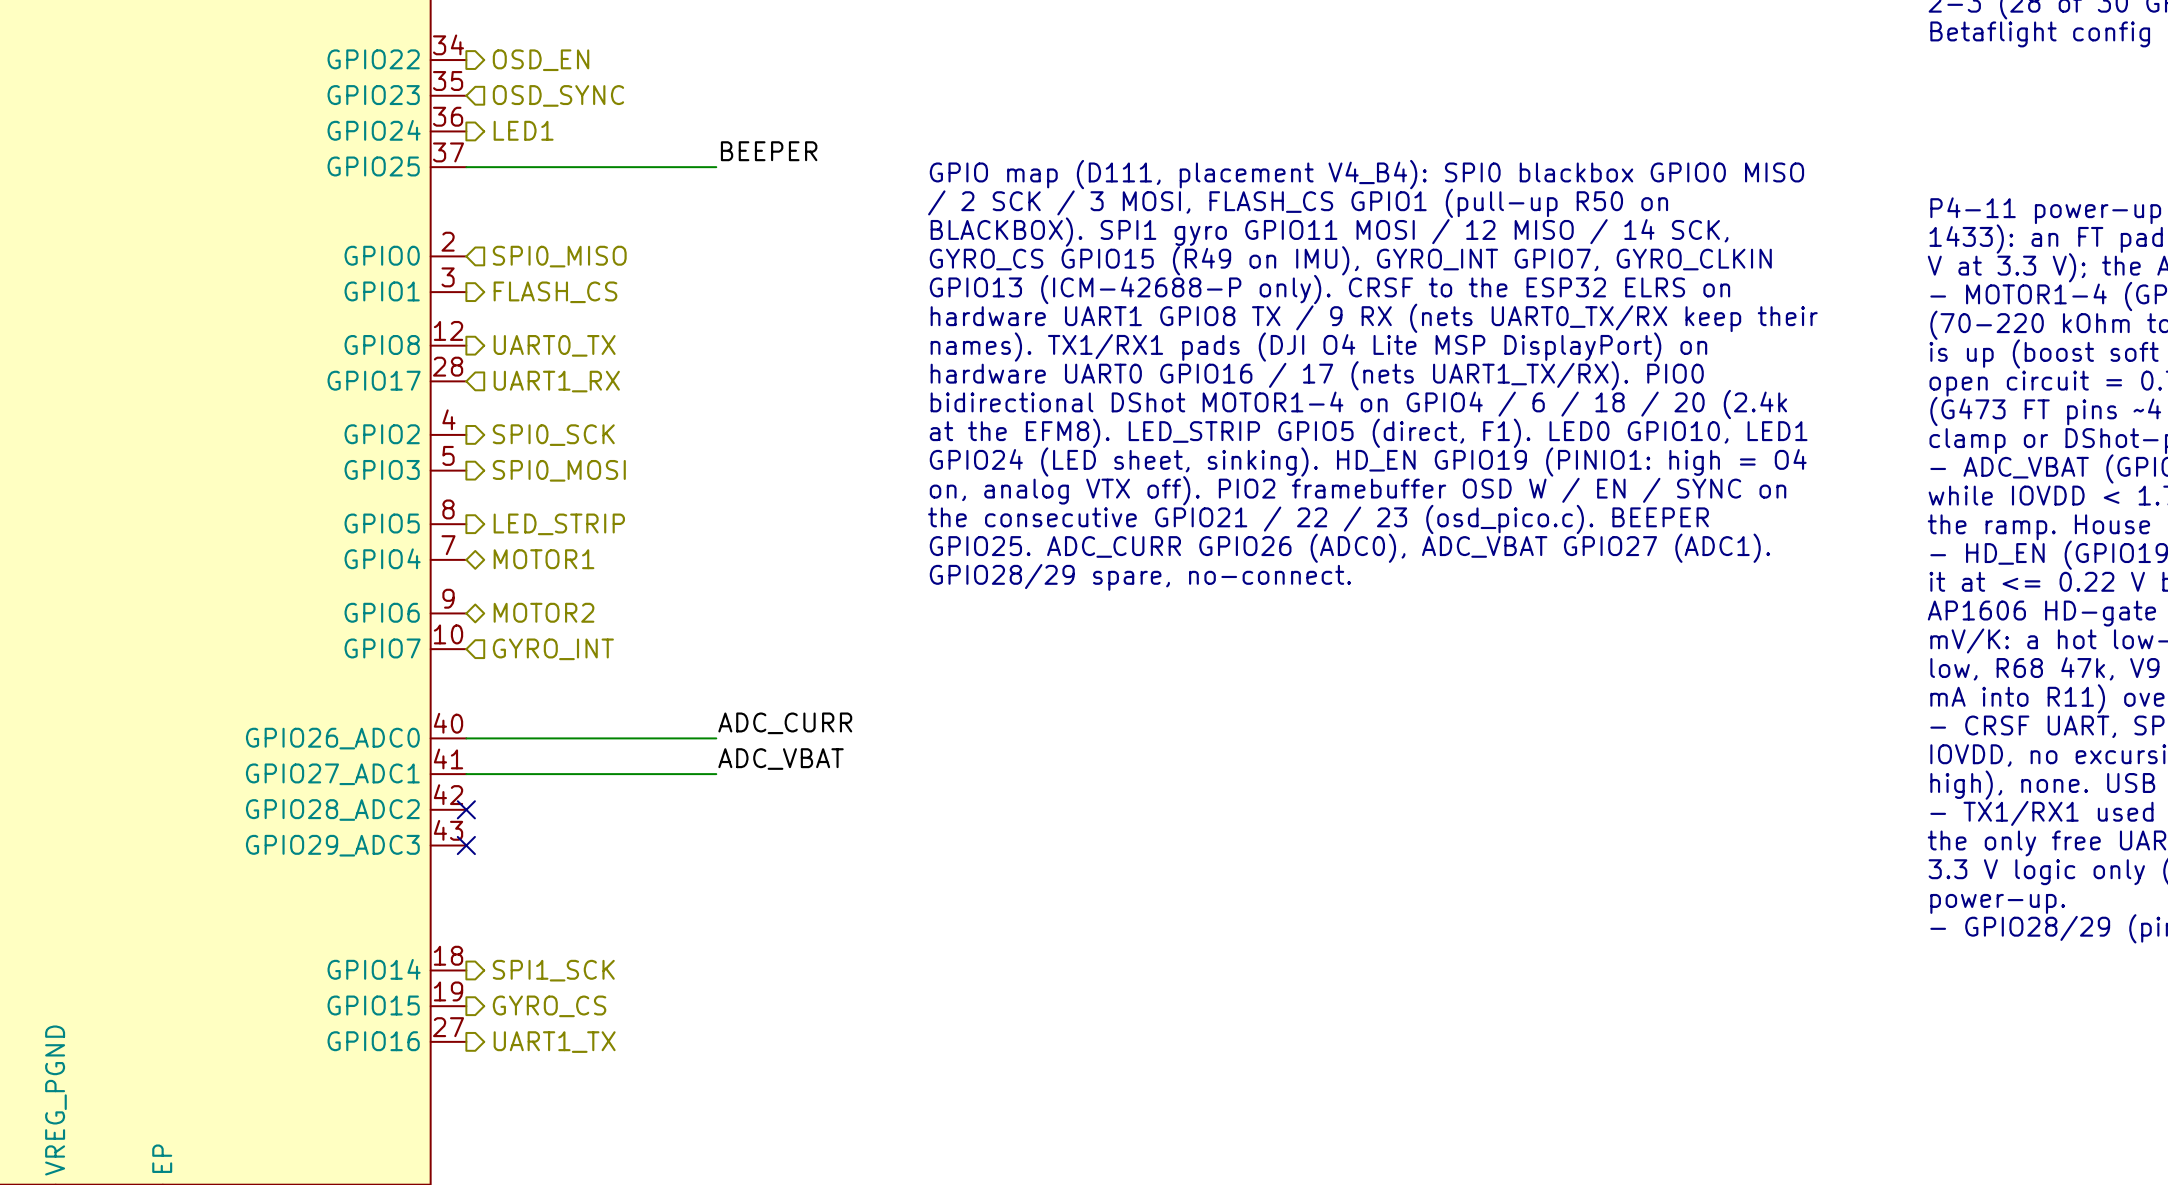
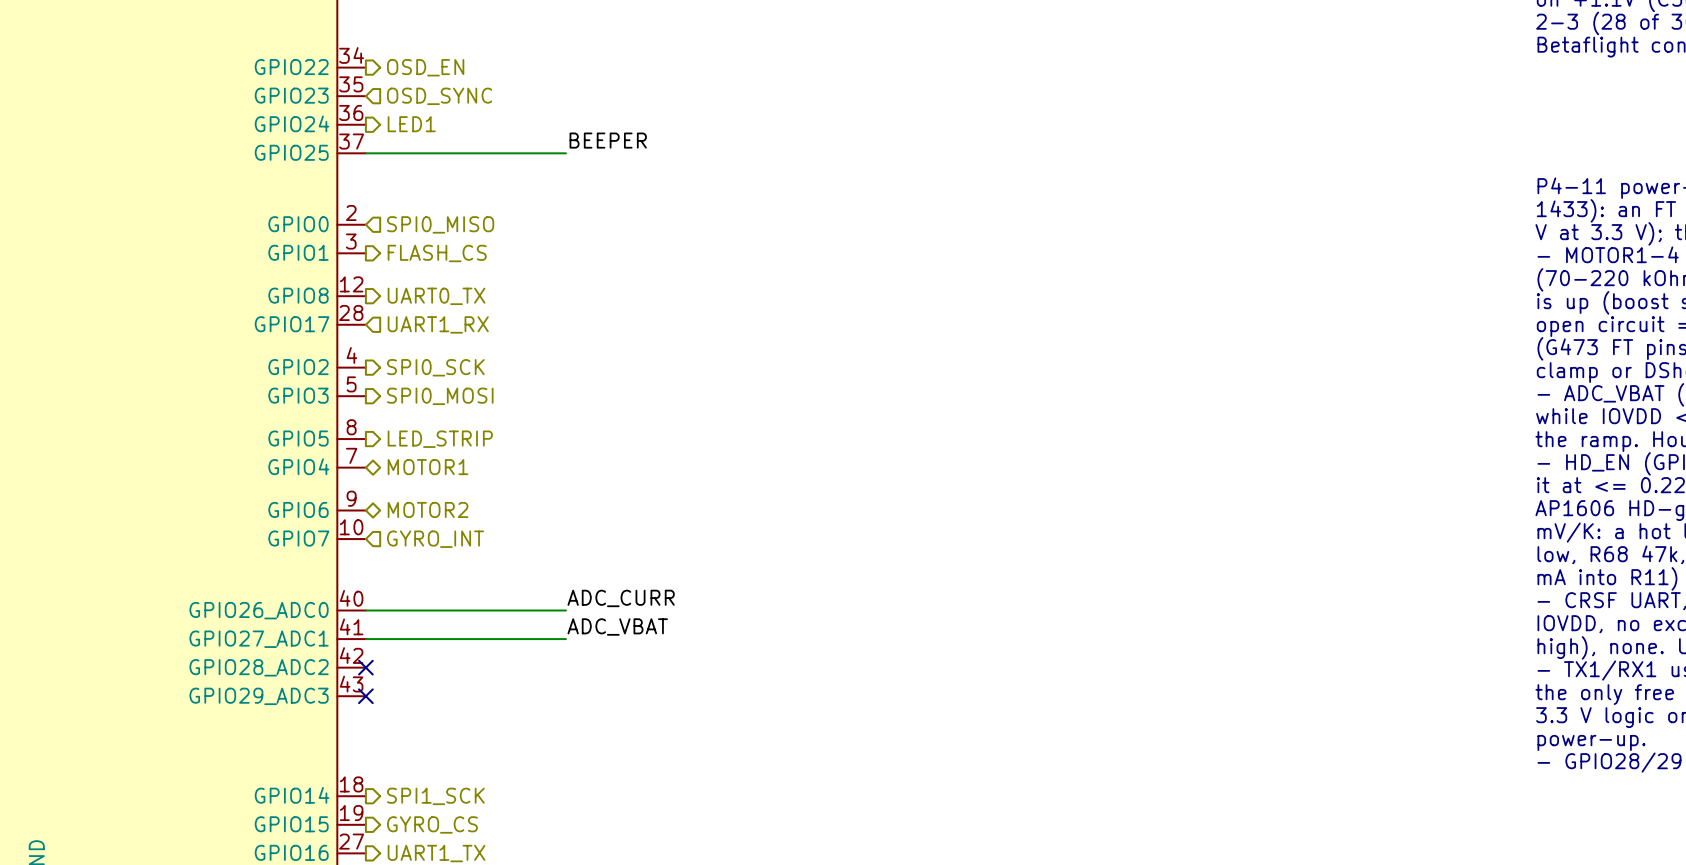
text: GPIO map (D111, placement V4_B4): SPI0 blackbox GPIO0 MISO (1366, 174) -> none
text: / 2 SCK / 3 MOSI, FLASH_CS GPIO1 (pull-up R50 on (1298, 203) -> none
text: BLACKBOX). SPI1 gyro GPIO11 MOSI / 12 MISO / 14 SCK, (1329, 232) -> none
text: GYRO_CS GPIO15 (R49 on IMU), GYRO_INT GPIO7, GYRO_CLKIN (1350, 260) -> none
text: GPIO13 (ICM-42688-P only). CRSF to the ESP32 ELRS on (1329, 289) -> none
text: hardware UART1 GPIO8 TX / 9 RX (nets UART0_TX/RX keep their (1374, 318) -> none
text: names). TX1/RX1 pads (DJI O4 Lite MSP DisplayPort) on (1318, 347) -> none
text: hardware UART0 GPIO16 / 17 (nets UART1_TX/RX). PIO0 (1317, 375) -> none
text: bidirectional DShot MOTOR1-4 on GPIO4 / 6 / 18 / 20 (2.4k (1358, 404) -> none
text: at the EFM8). LED_STRIP GPIO5 (direct, F1). LED0 GPIO10, LED1 (1368, 433) -> none
text: GPIO24 (LED sheet, sinking). HD_EN GPIO19 (PINIO1: high = O4 (1368, 462) -> none
text: on, analog VTX off). PIO2 framebuffer OSD W / EN / SYNC on (1358, 490) -> none
text: the consecutive GPIO21 / 22 / 23 (osd_pico.c). BEEPER (1318, 519) -> none
text: GPIO25. ADC_CURR GPIO26 (ADC0), ADC_VBAT GPIO27 (ADC1). (1349, 548) -> none
text: GPIO28/29 spare, no-connect. (1140, 577) -> none

